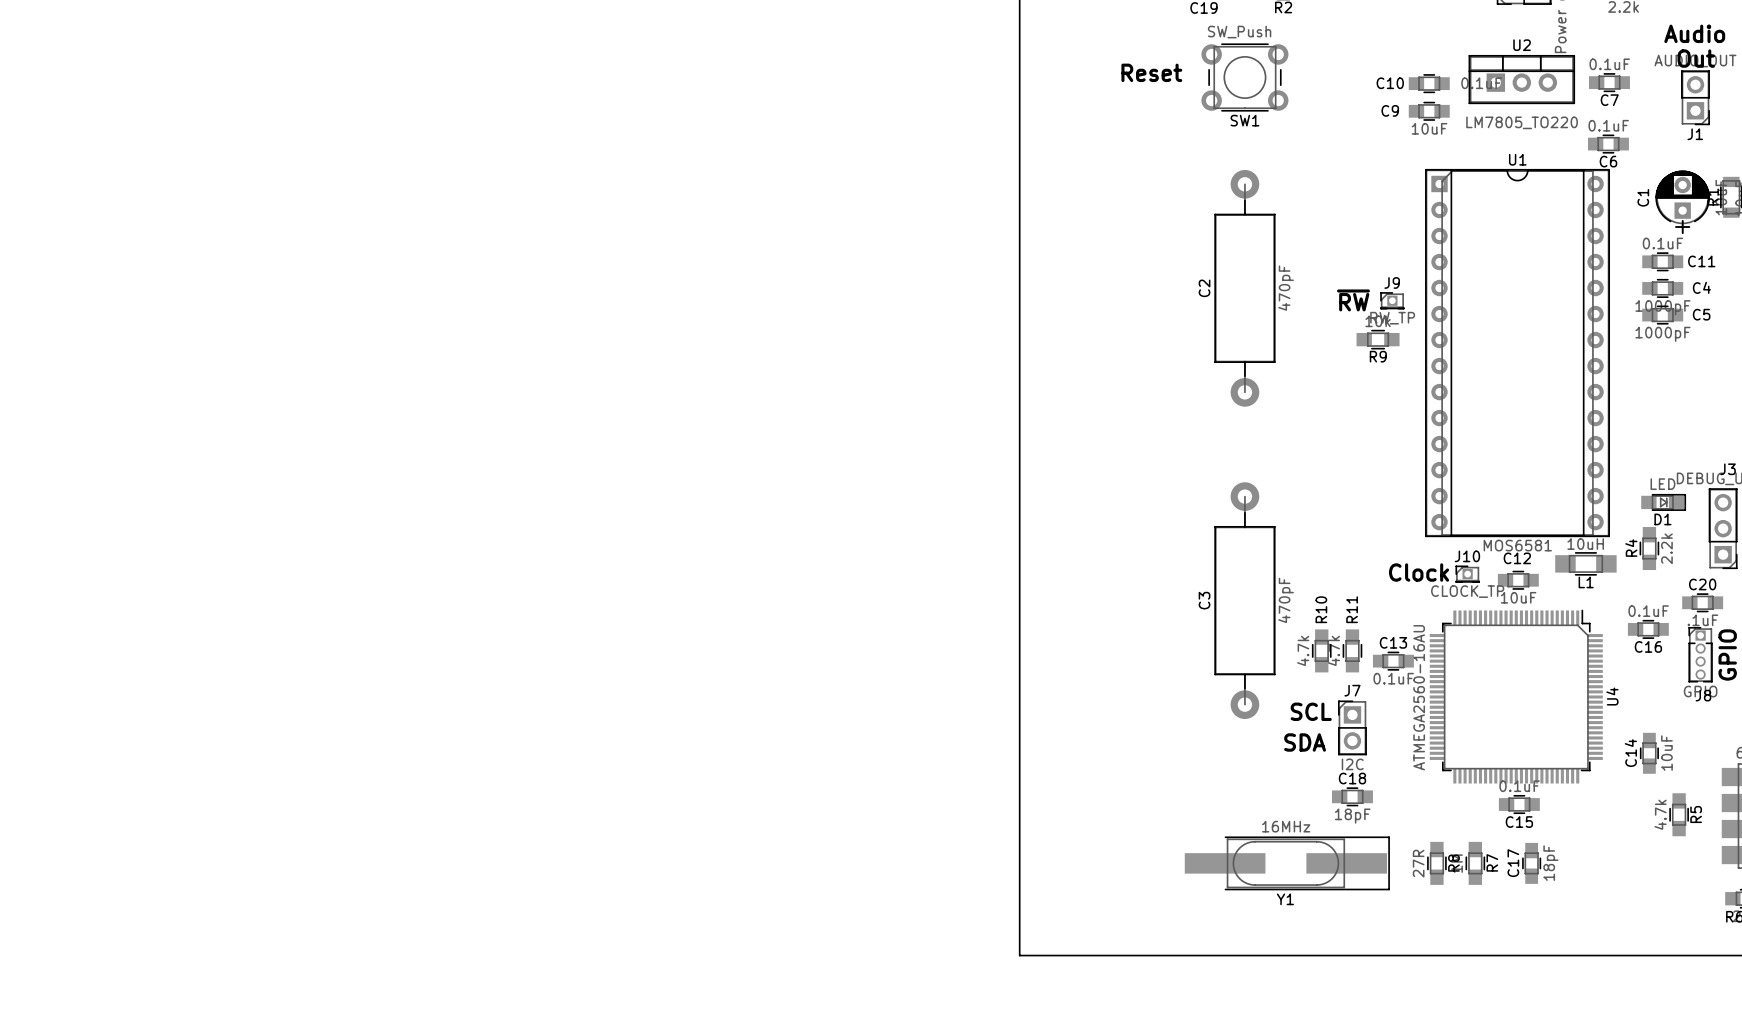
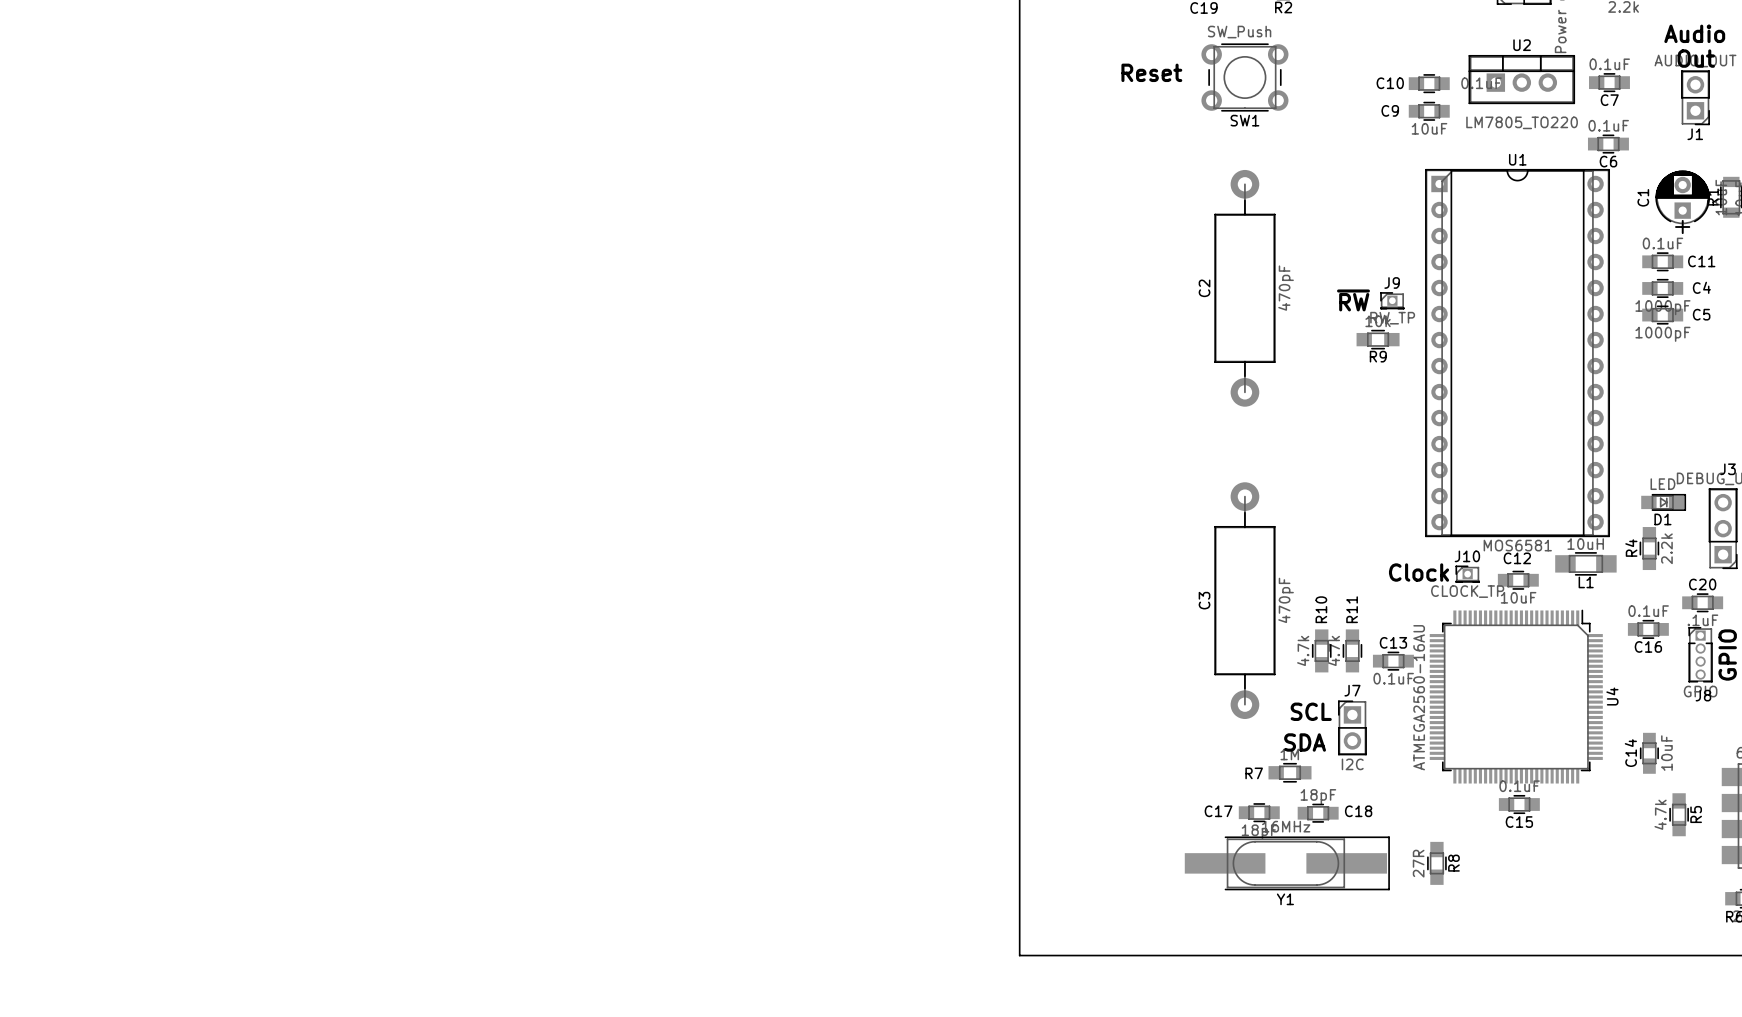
C18 name position: C18 (1352, 778) -> C18 (1358, 811)
C18 position: (1352, 796) -> (1318, 813)
C18 value position: 18pF (1352, 816) -> 18pF (1318, 796)
R7 name position: R7 (1492, 862) -> R7 (1254, 773)
R7 rotation: 0° (1475, 863) -> 90° clockwise (1290, 772)
R7 position: (1475, 863) -> (1290, 772)
C17 name position: C17 (1513, 863) -> C17 (1218, 811)
C17 rotation: 0° (1531, 863) -> 90° clockwise (1259, 812)
C17 position: (1531, 863) -> (1259, 812)

